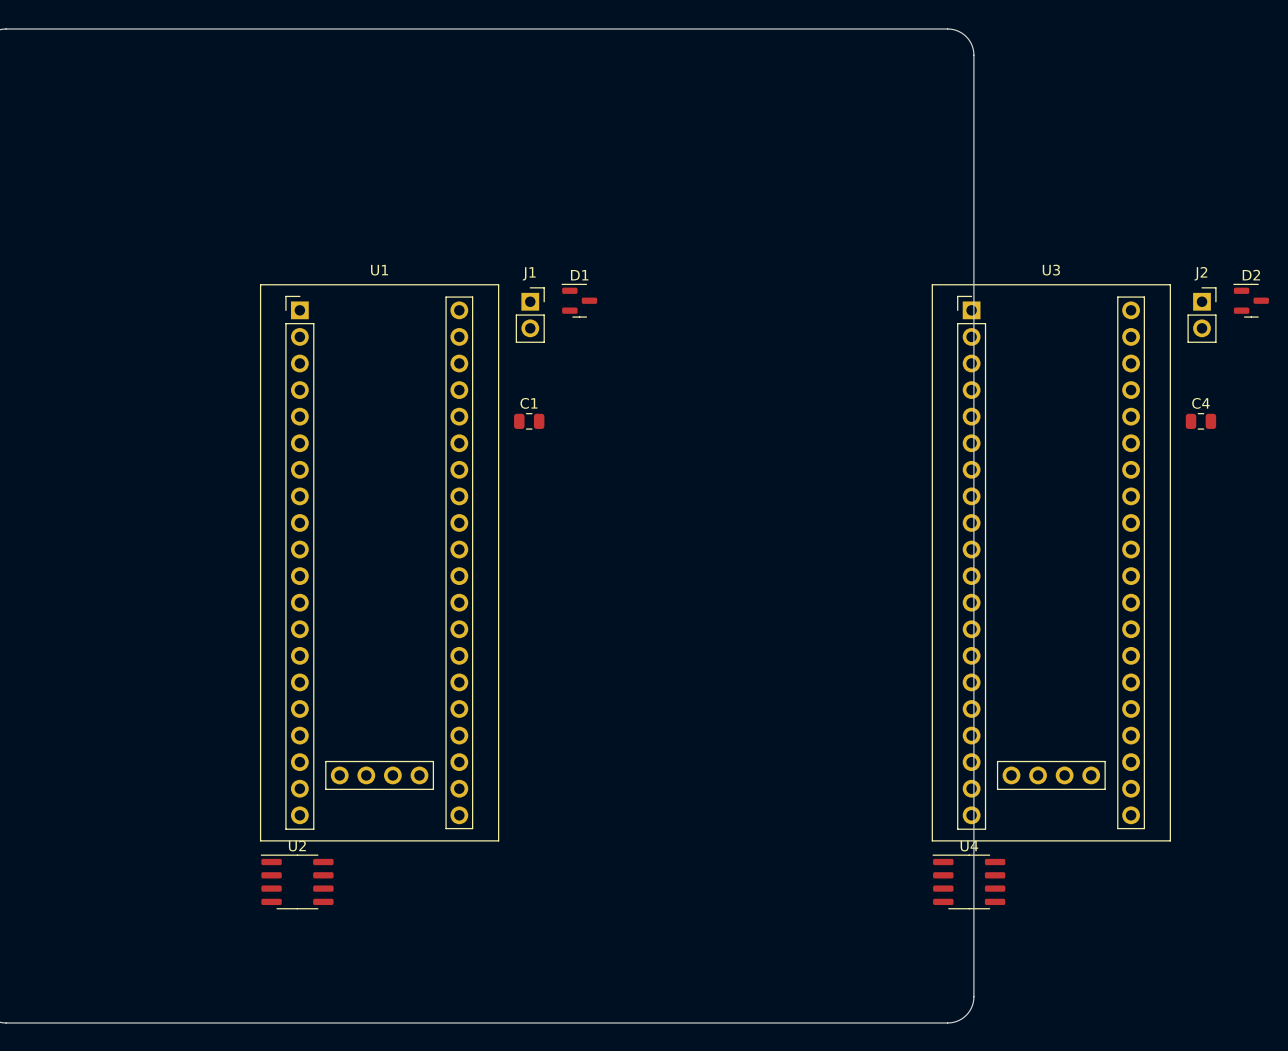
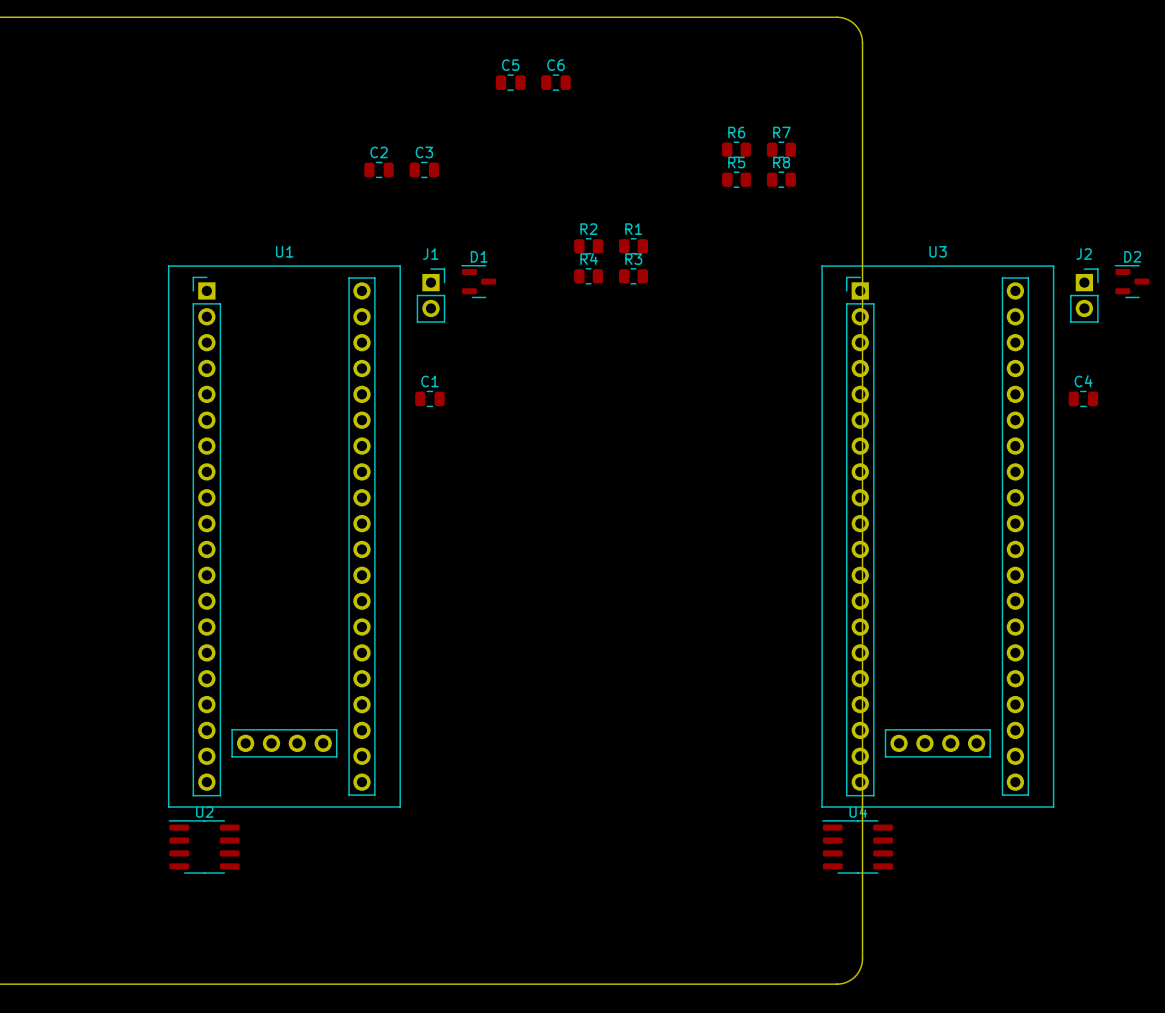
C5: none -> (510, 82)
C6: none -> (555, 82)
R6: none -> (736, 149)
R7: none -> (781, 149)
C2: none -> (379, 169)
C3: none -> (424, 169)
R5: none -> (736, 179)
R8: none -> (781, 179)
R2: none -> (588, 246)
R1: none -> (633, 246)
R4: none -> (588, 276)
R3: none -> (633, 276)

